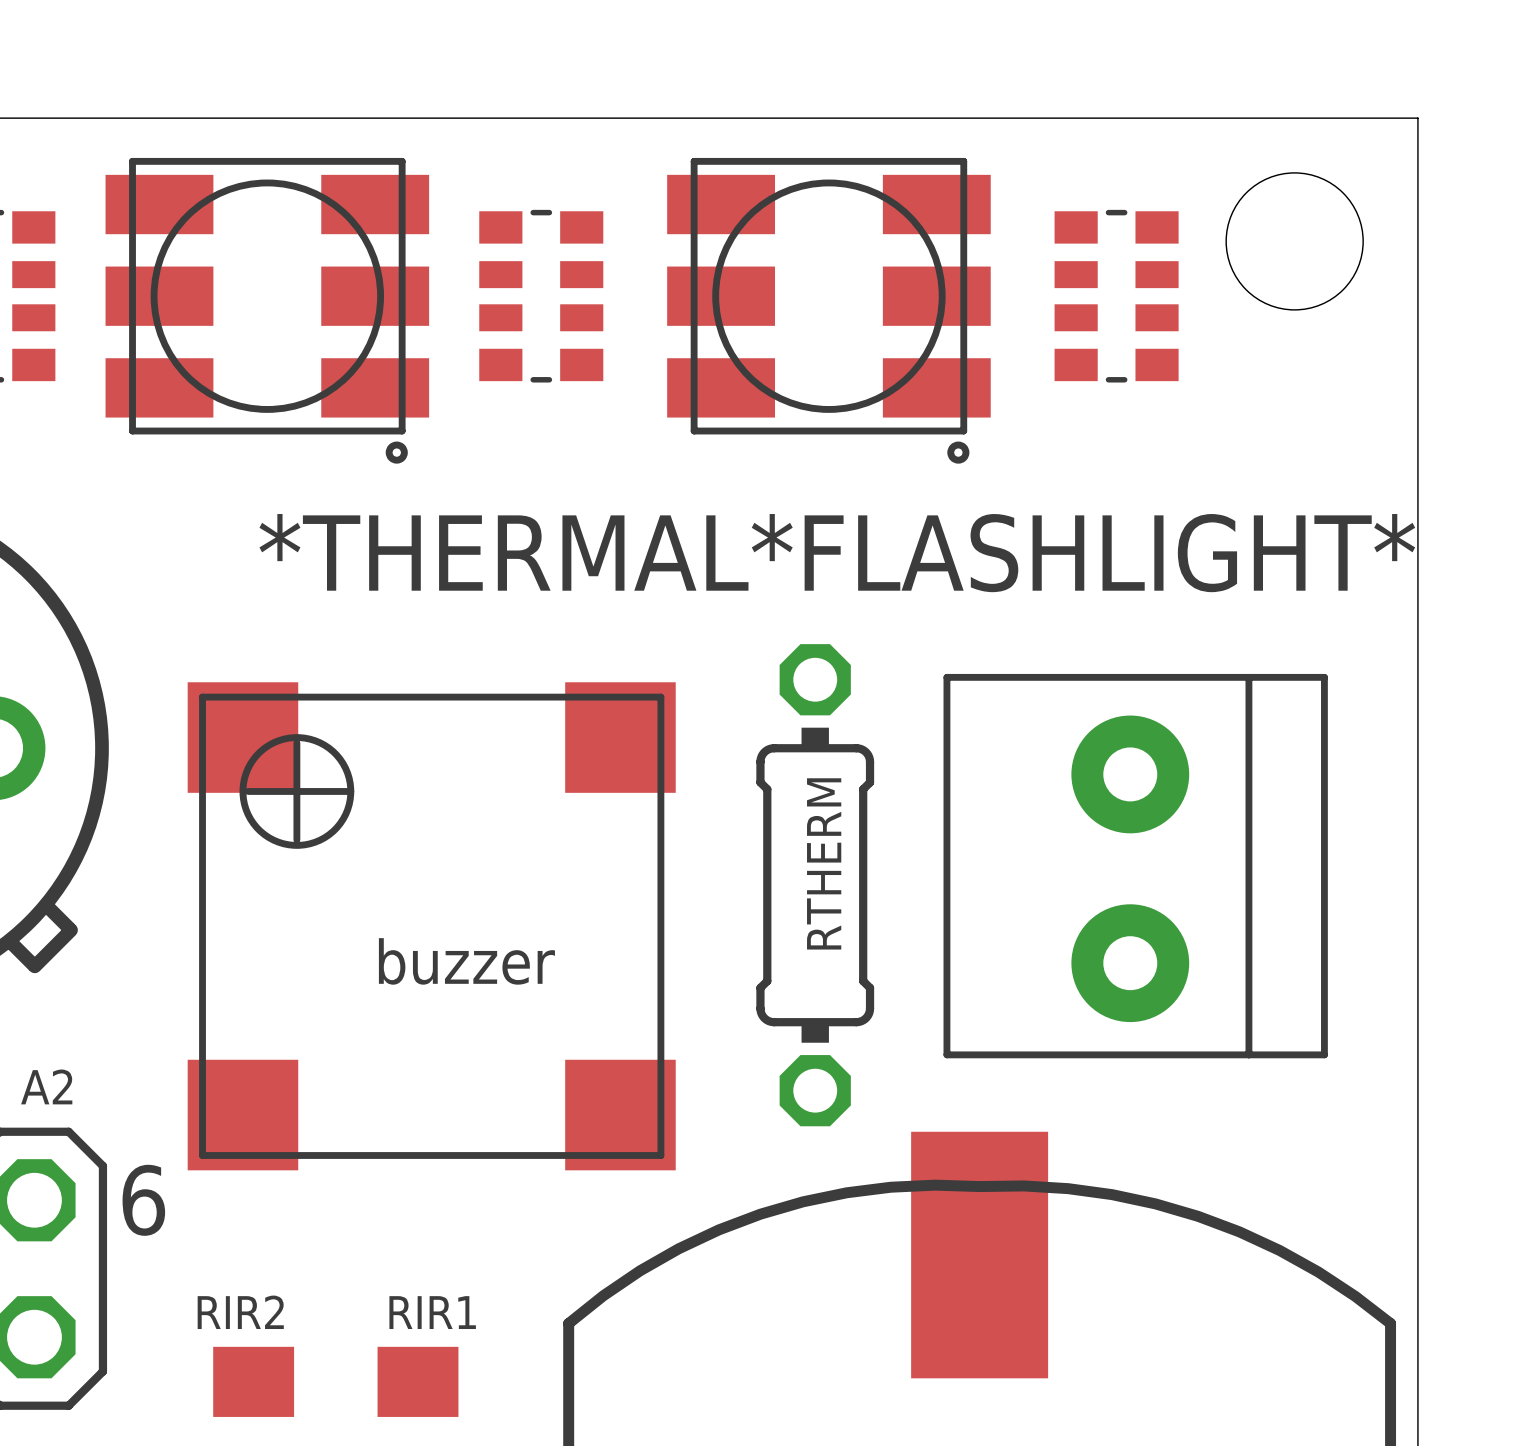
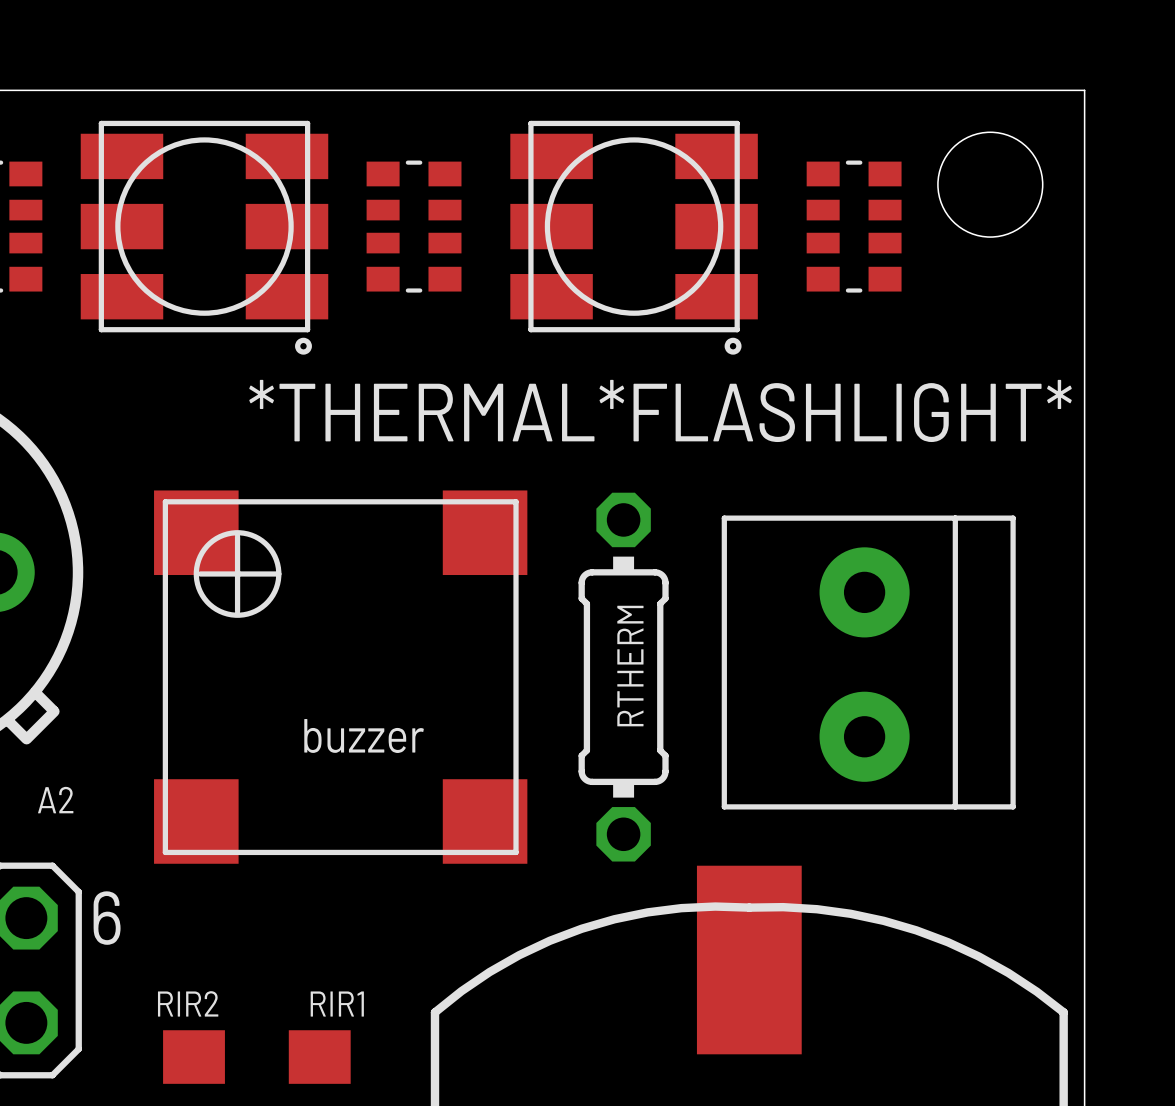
text position: *THERMAL*FLASHLIGHT* (837, 553) -> *THERMAL*FLASHLIGHT* (660, 410)
part position: (431, 926) -> (340, 677)
text position: A2 (46, 1086) -> A2 (55, 800)

